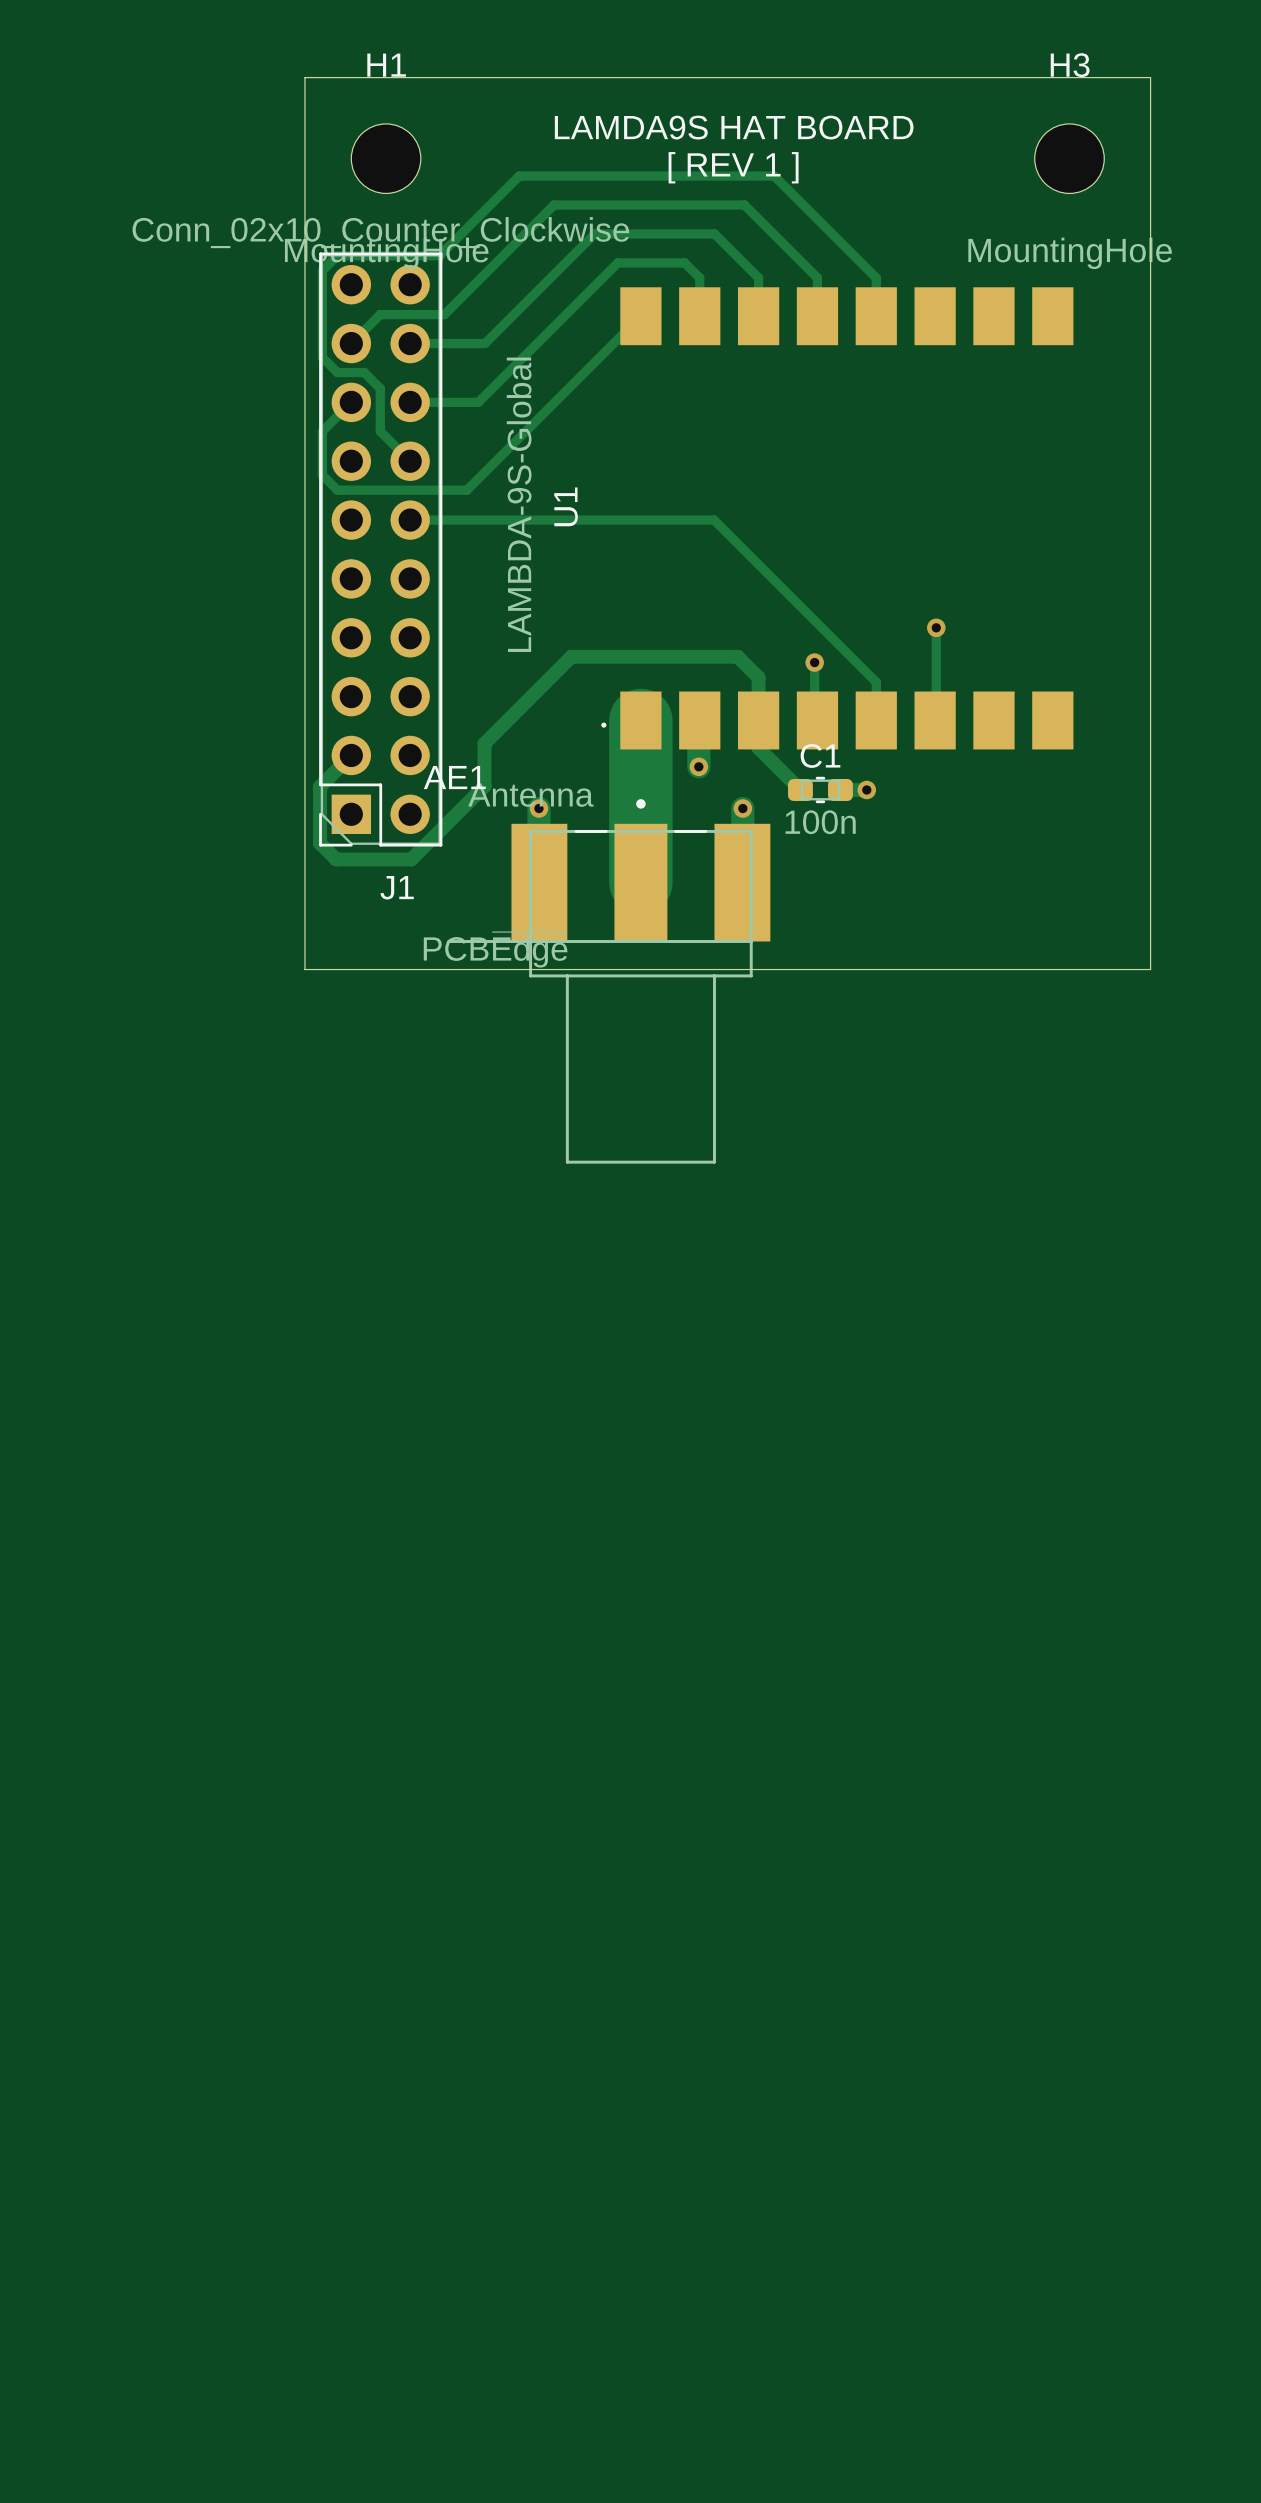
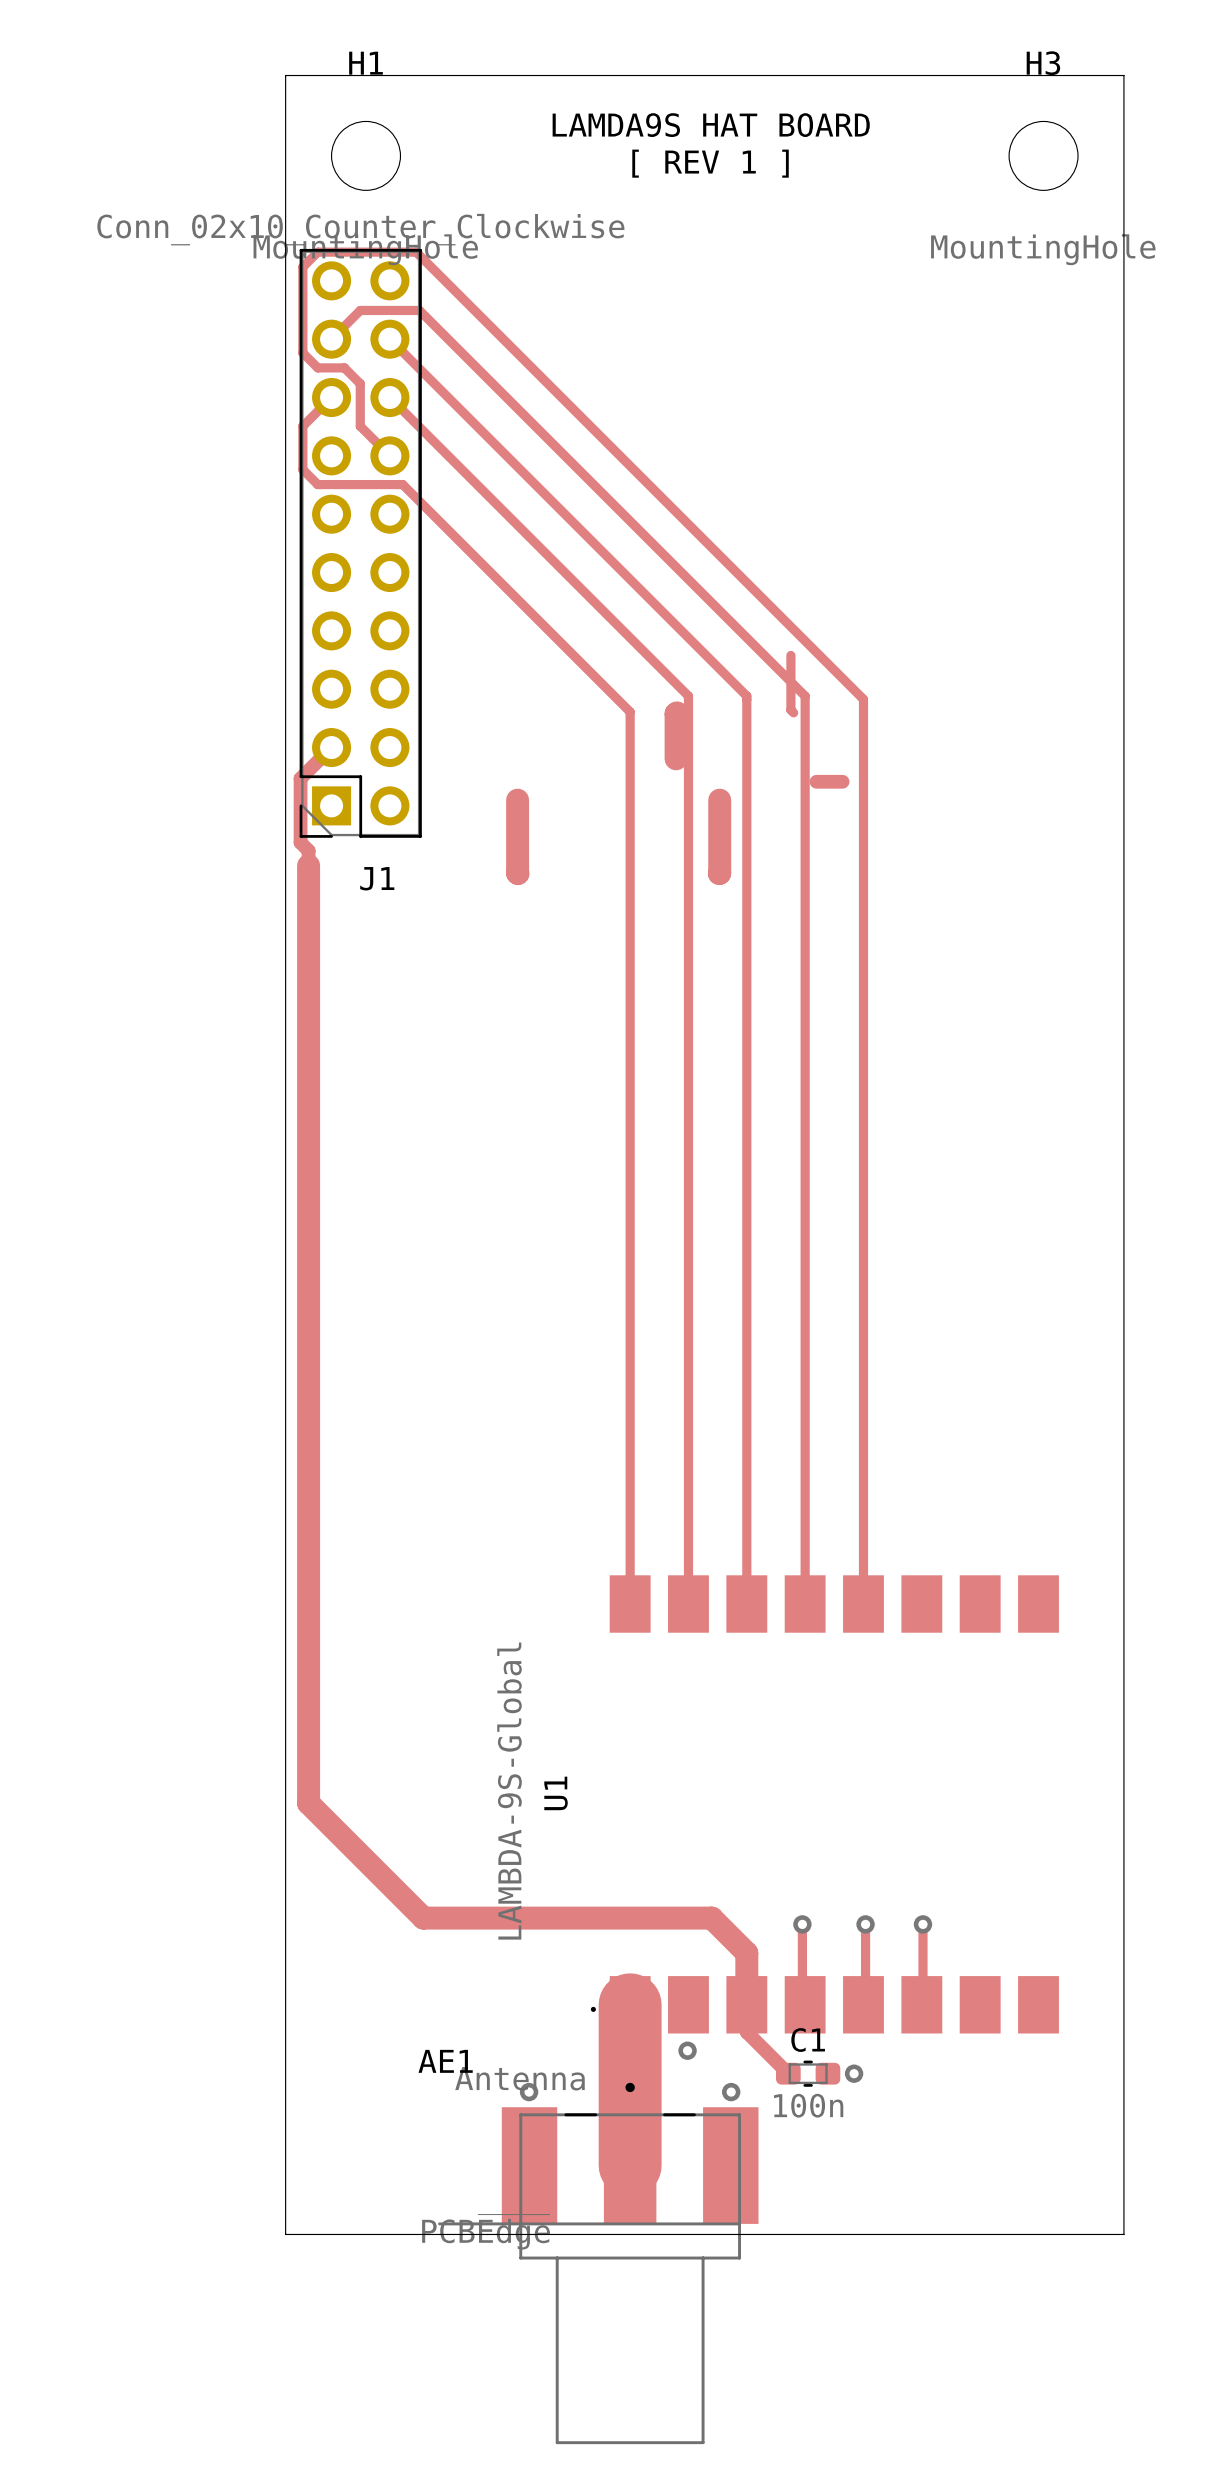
track: (436, 255) (439, 255) (519, 176) (774, 176) (876, 277) (876, 316) -> (416, 252) (863, 699) (863, 1604)
track: (440, 314) (444, 314) (554, 205) (744, 205) (817, 277) (817, 316) -> (419, 310) (805, 696) (805, 1604)
track: (640, 316) (466, 490) (423, 490) -> (630, 1604) (630, 711) (402, 484)
track: (699, 316) (699, 277) (684, 262) (617, 262) (478, 402) (410, 402) -> (688, 1604) (688, 696) (389, 397)
track: (758, 316) (758, 277) (714, 233) (594, 233) (485, 343) (410, 343) -> (746, 1604) (746, 696) (389, 339)
U1 position: (846, 518) -> (834, 1804)
track: (410, 520) (714, 520) (876, 682) (876, 720) -> none
track: (936, 627) (935, 720) -> none
via: (936, 627) -> none
via: (814, 662) -> none
track: (640, 720) (640, 882) -> none
drawing: [601, 722, 607, 728] -> none
via: (698, 766) -> none
track: (800, 789) (758, 748) (758, 677) (737, 656) (571, 656) (484, 743) (484, 786) (411, 859) (336, 859) (320, 843) -> (788, 2073) (746, 2032) (746, 1953) (711, 1918) (423, 1918) (308, 1803) (308, 850) (300, 842) (300, 834)
C1 position: (820, 789) -> (808, 2073)
via: (866, 789) -> none
via: (538, 808) -> none
via: (742, 808) -> none
board edge: (304, 969) (1150, 969) -> (285, 959) (285, 2234) (1123, 2234) (1123, 959)
AE1 position: (608, 981) -> (598, 2263)
track: none -> (802, 1924) (802, 2002) (805, 2004)
via: none -> (802, 1924)
track: none -> (865, 1924) (865, 2002) (863, 2004)
via: none -> (865, 1924)
track: none -> (922, 1924) (921, 2004)
via: none -> (922, 1924)
track: none -> (630, 2004) (630, 2165)
drawing: none -> [590, 2006, 596, 2012]
via: none -> (687, 2050)
via: none -> (854, 2073)
via: none -> (529, 2092)
via: none -> (731, 2092)

